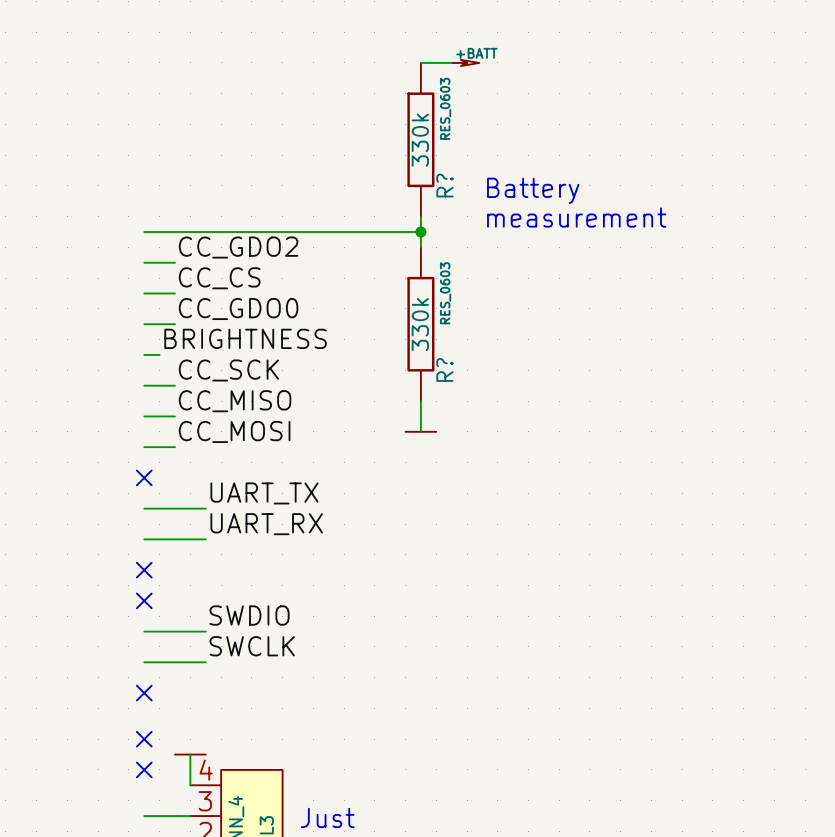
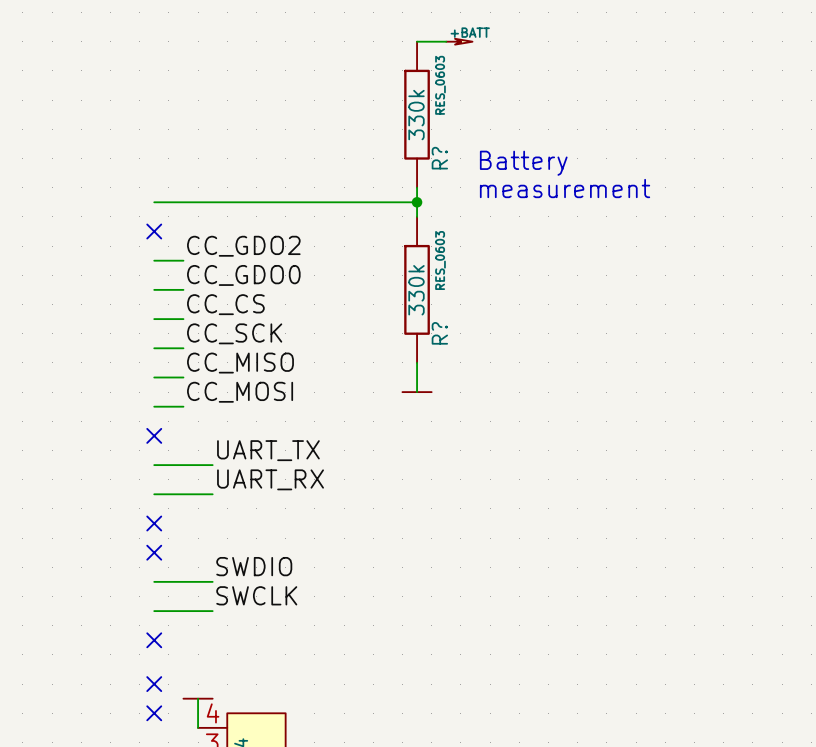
label: CC_GDO2 (238, 247) -> none
wire: (144, 262) (175, 262) -> none
no-connect mark: none -> (154, 231)
label: CC_CS (219, 278) -> CC_GDO2 (243, 246)
label: BRIGHTNESS (245, 338) -> none
label: none -> CC_CS (225, 304)
wire: none -> (168, 319) (183, 319)

